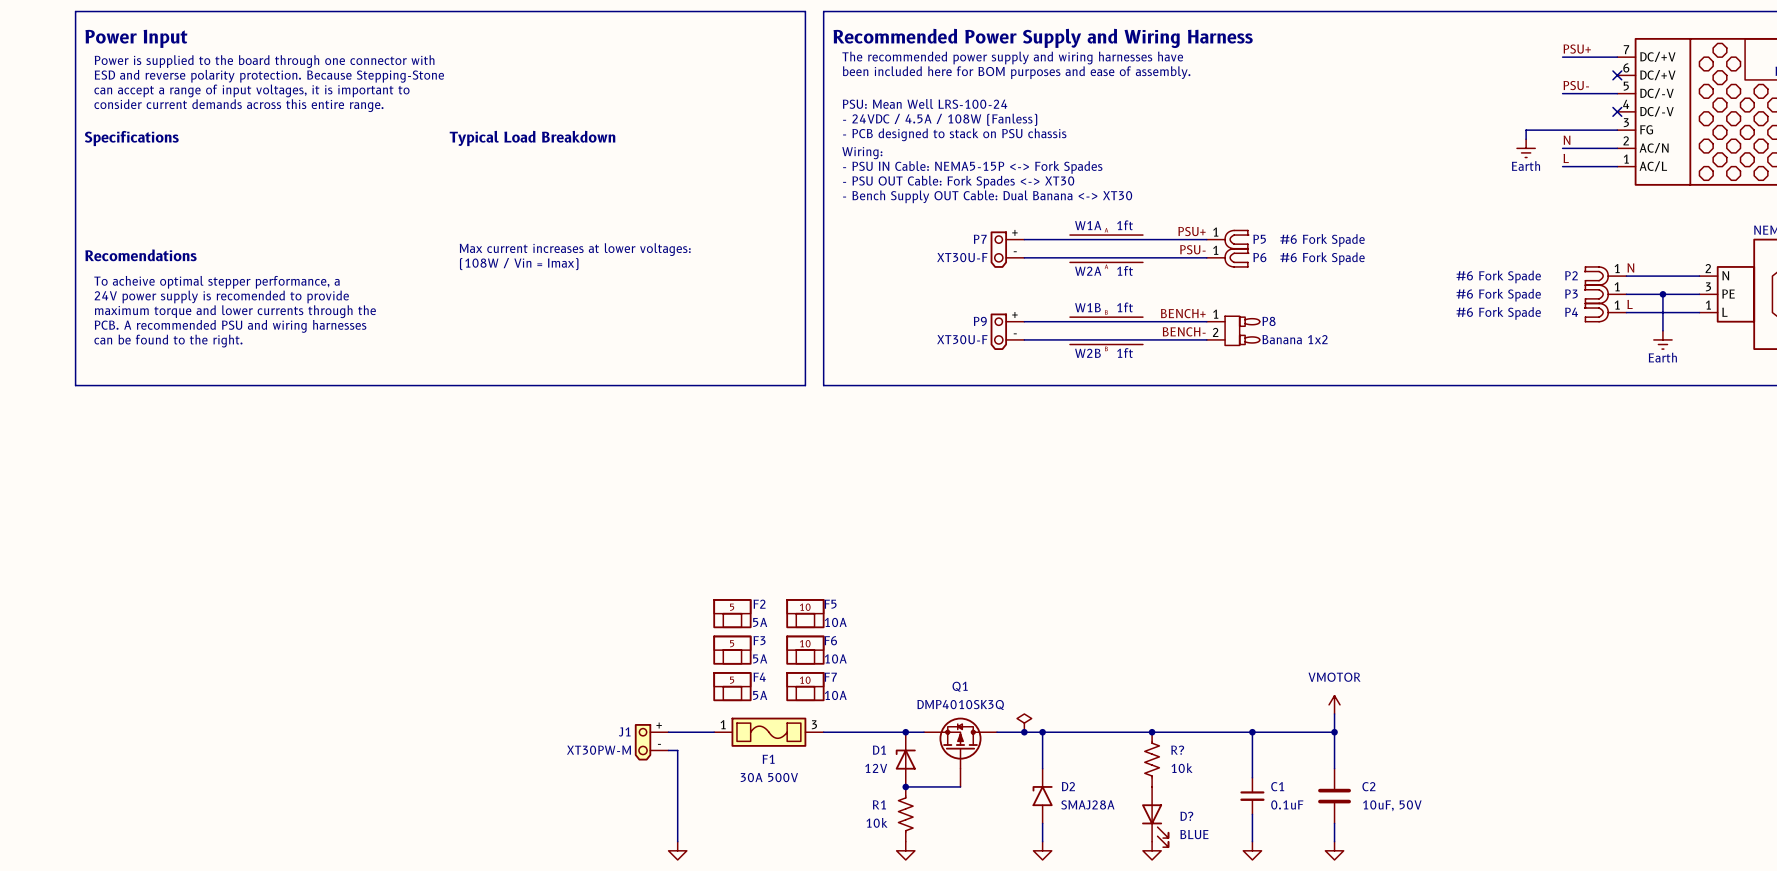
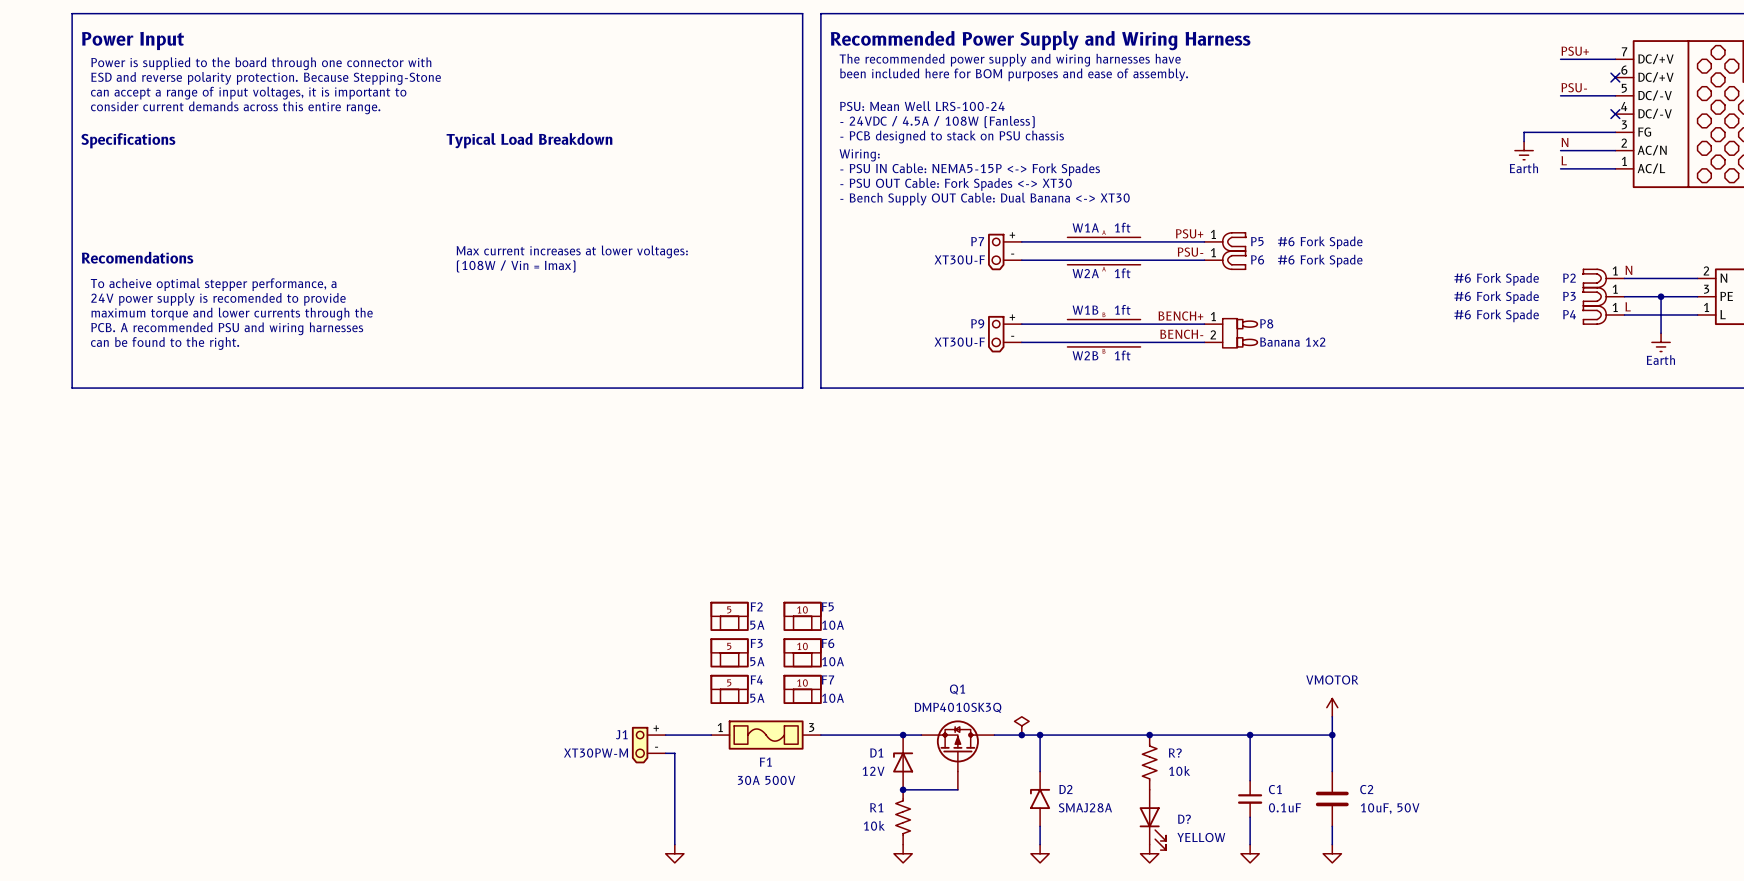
D? value: BLUE (1194, 834) -> YELLOW (1201, 837)

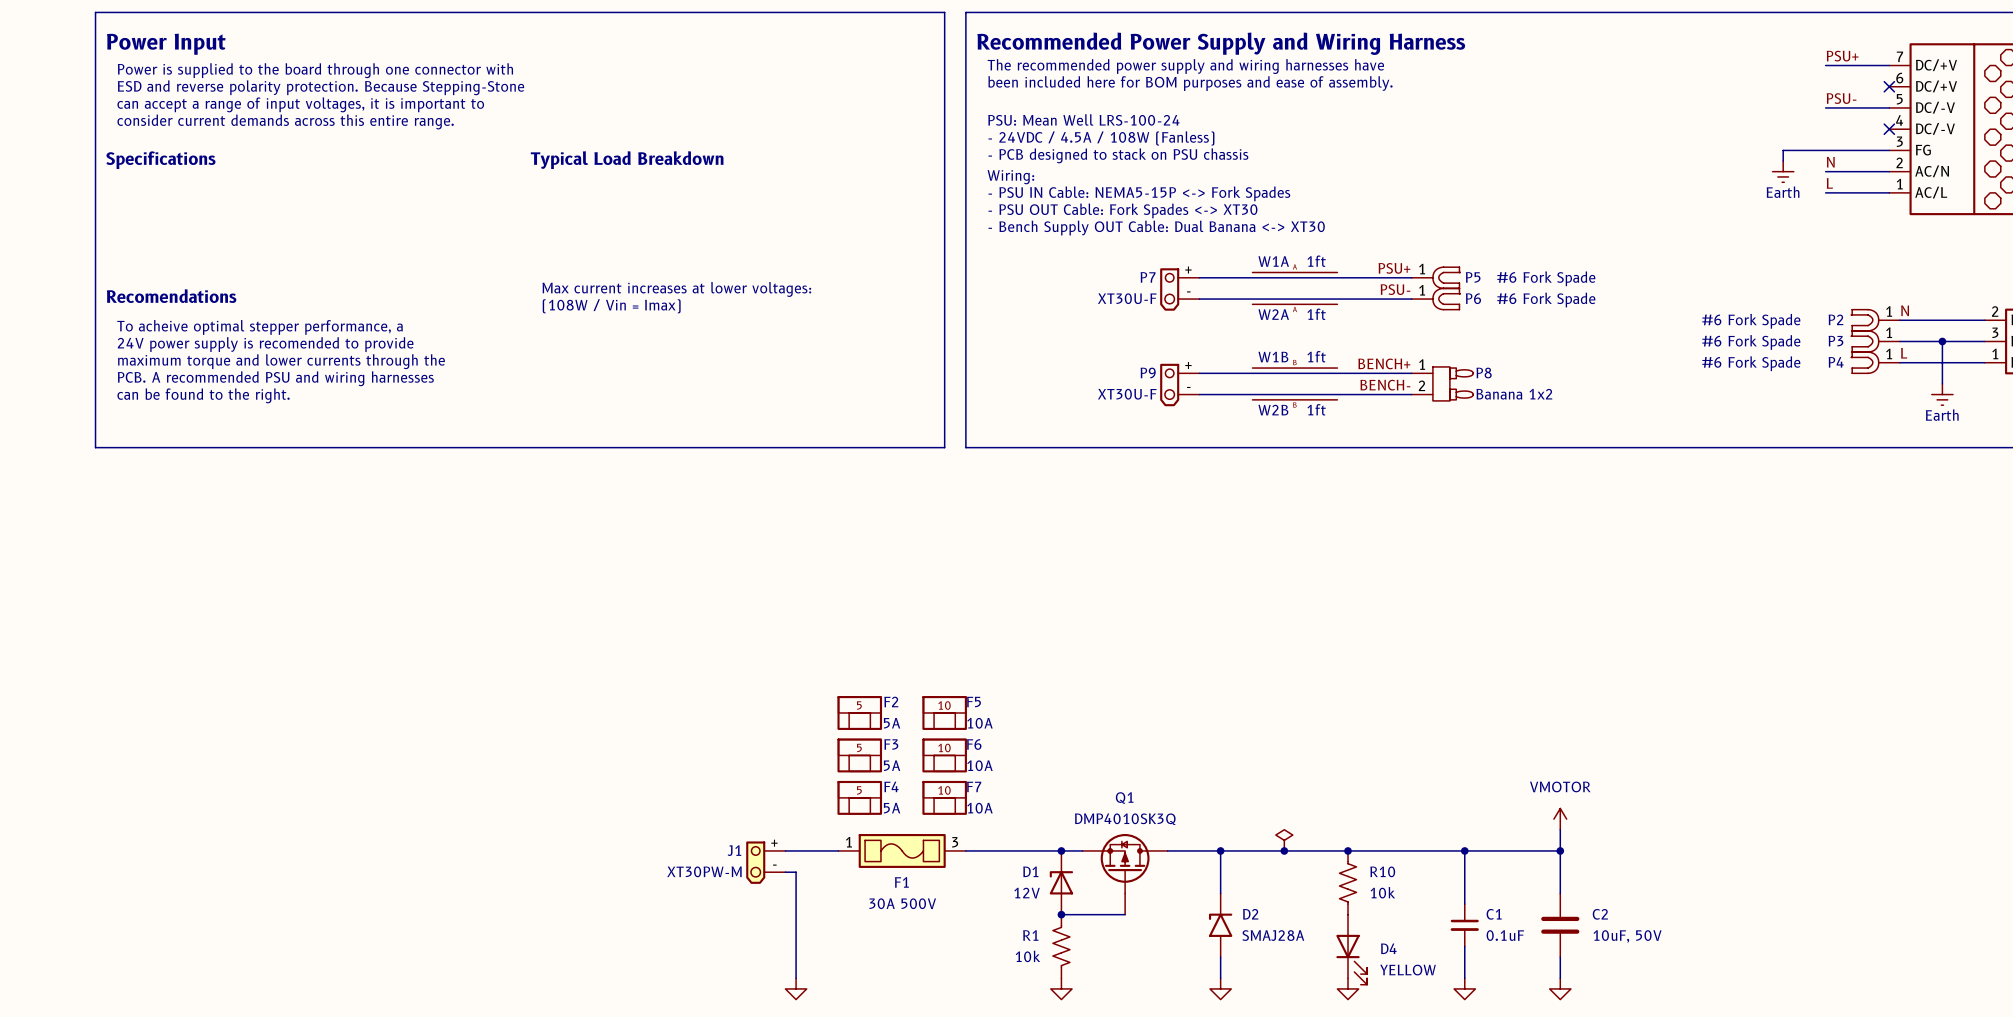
power symbol position: (1021, 725) -> (1284, 840)
junction: (1021, 735) -> none
junction: none -> (1284, 850)
R? name: R? (1175, 753) -> R10 (1382, 871)
D? name: D? (1184, 819) -> D4 (1388, 948)

